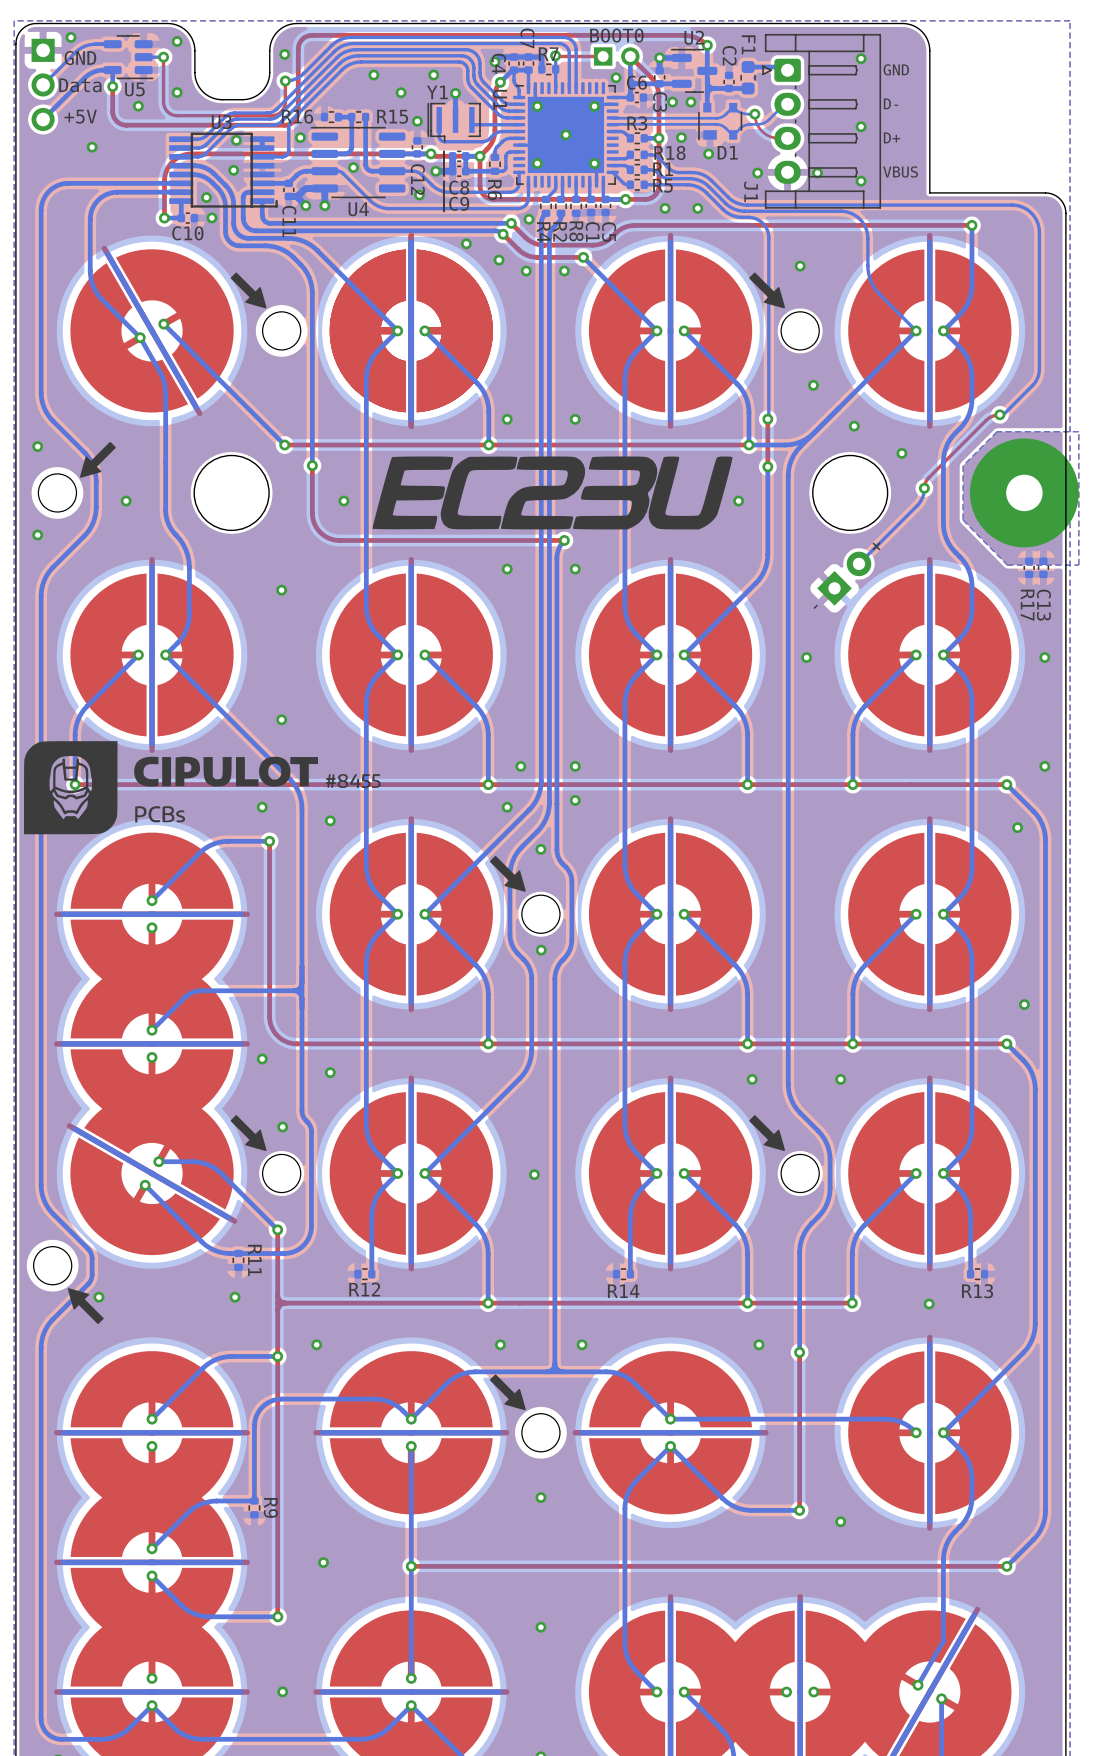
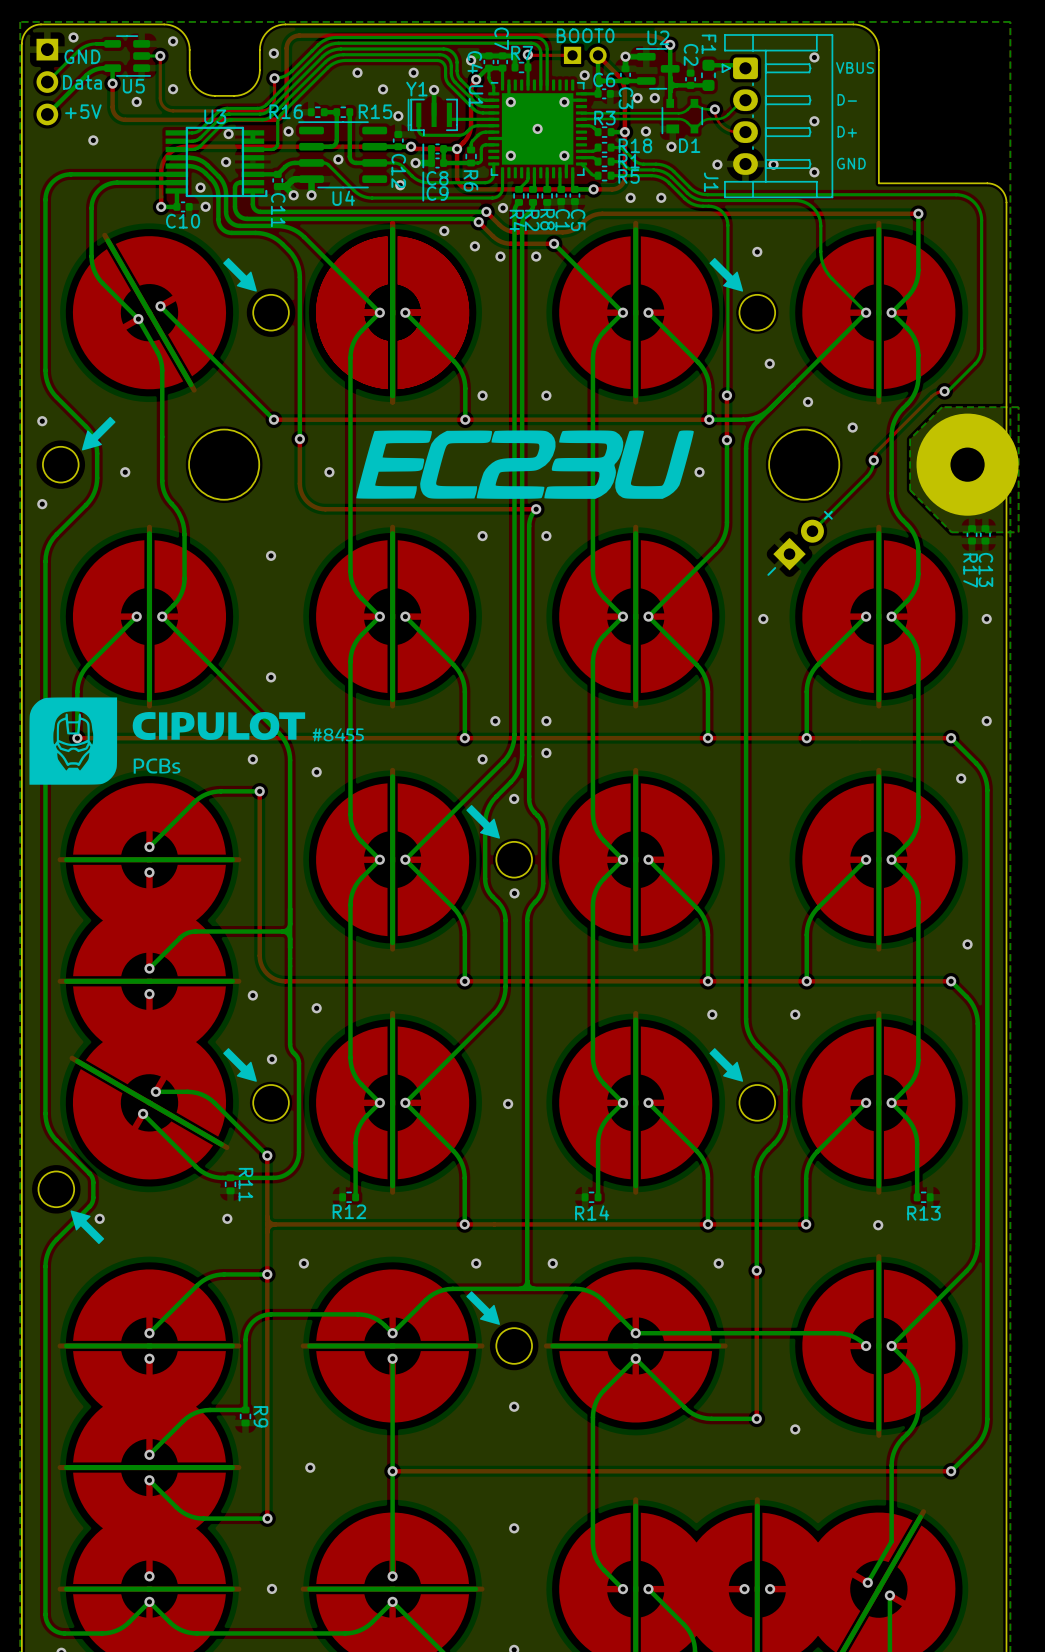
text: GND (896, 69) -> VBUS (855, 67)
text: VBUS (900, 171) -> GND (851, 163)

